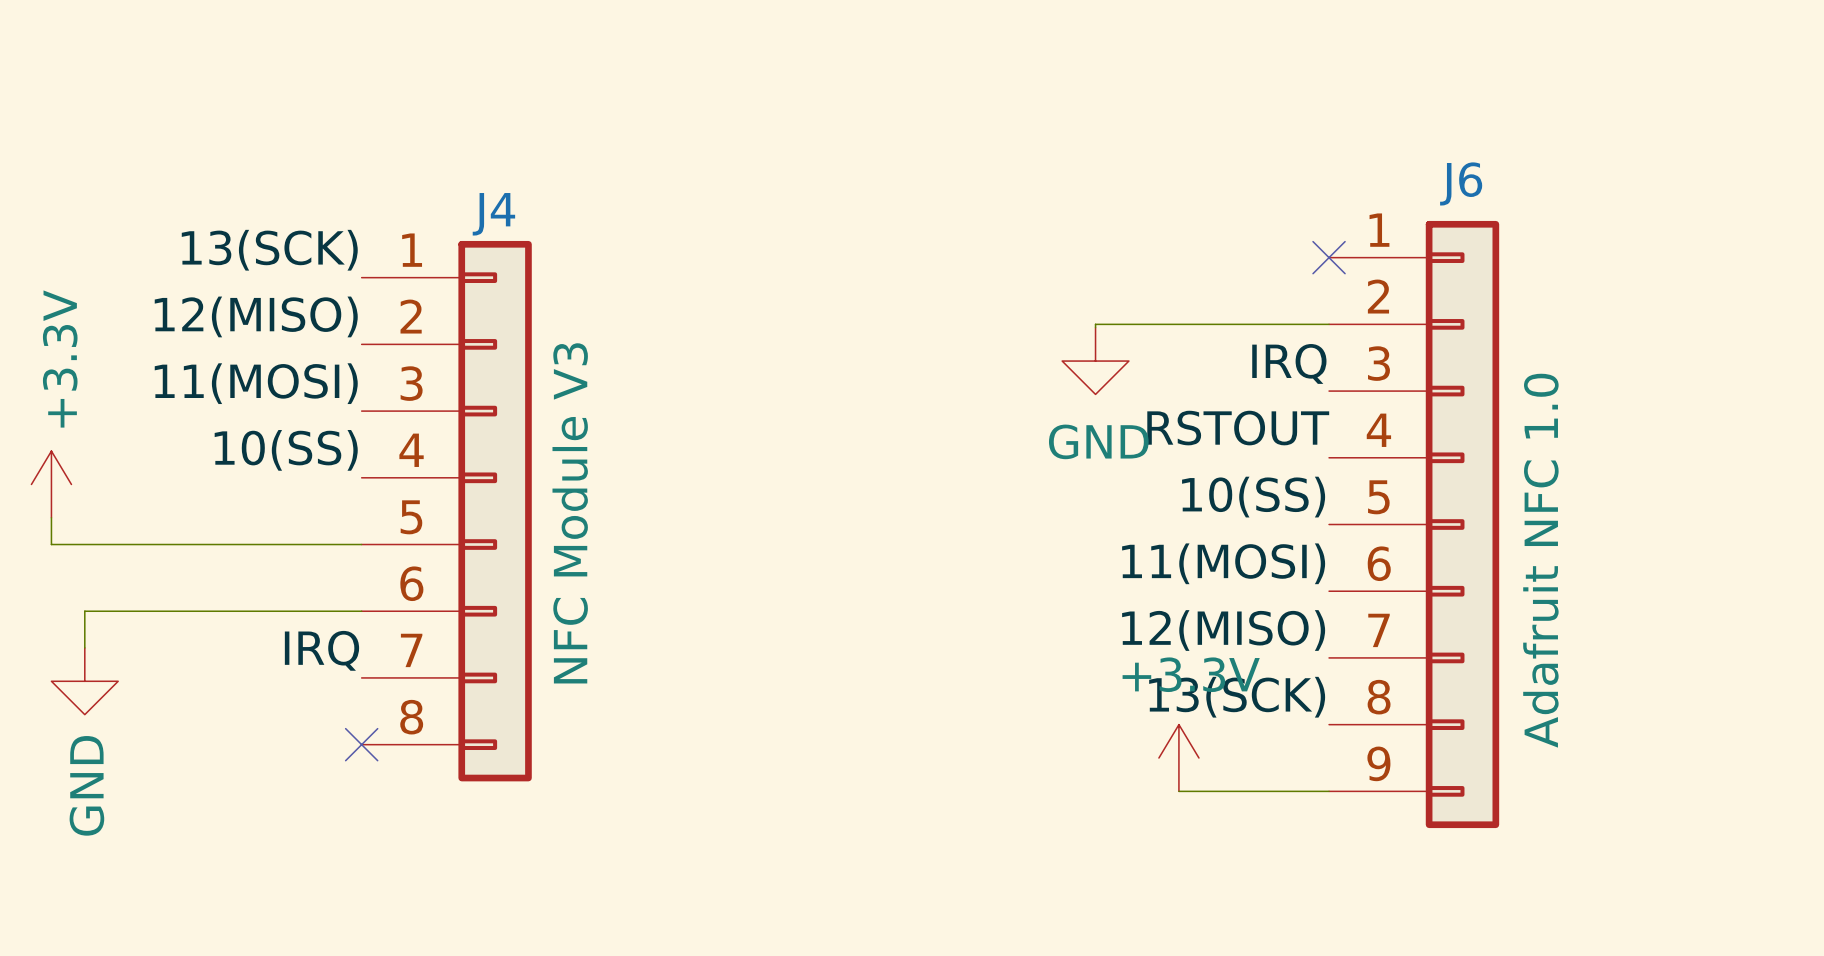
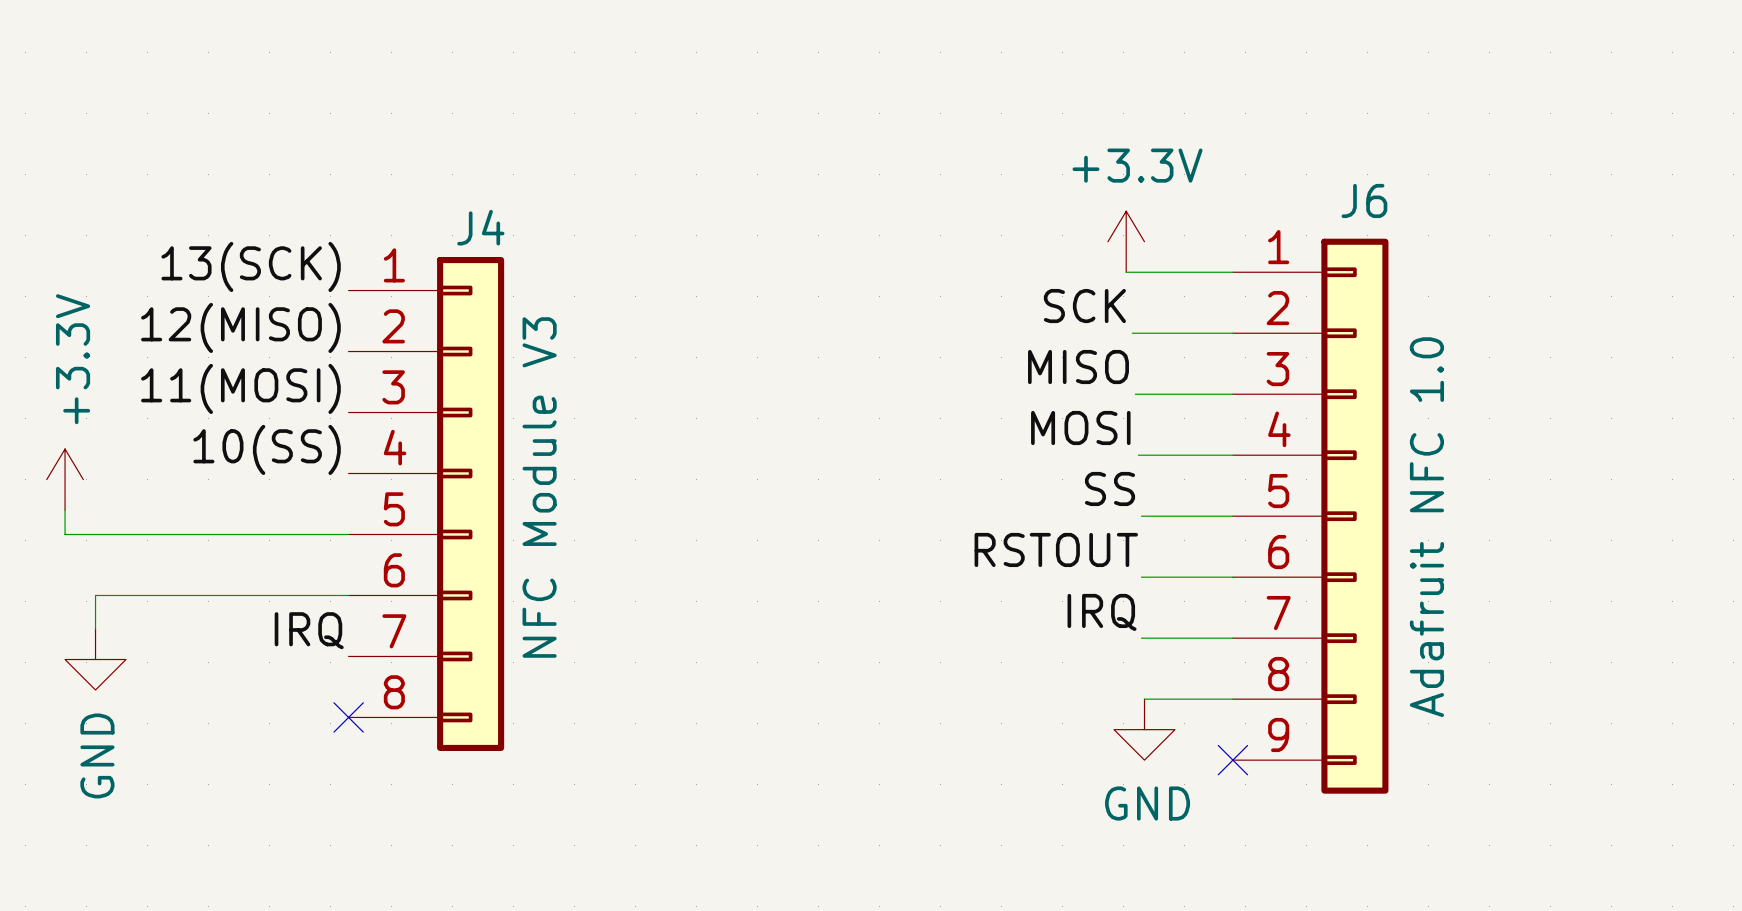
wire: none -> (1126, 272) (1232, 272)
no-connect mark: (1329, 257) -> none
label: none -> SCK (1084, 306)
wire: (1218, 324) (1095, 324) (1095, 327) -> none
power symbol position: GND (1095, 361) -> GND (1144, 729)
label: none -> MISO (1078, 367)
label position: IRQ (1289, 363) -> IRQ (1102, 612)
wire: none -> (1135, 394) (1232, 394)
label: none -> MOSI (1080, 427)
label position: RSTOUT (1238, 428) -> RSTOUT (1056, 549)
wire: none -> (1138, 455) (1232, 455)
label: none -> SS (1110, 488)
label: 10(SS) (1253, 497) -> none
wire: none -> (1141, 516) (1232, 516)
label: 11(MOSI) (1223, 563) -> none
wire: none -> (1141, 577) (1232, 577)
label: 12(MISO) (1223, 630) -> none
wire: none -> (1141, 638) (1232, 638)
label: 13(SCK) (1237, 697) -> none
wire: none -> (1144, 699) (1232, 699)
power symbol position: +3.3V (1178, 758) -> +3.3V (1126, 241)
wire: (1178, 791) (1329, 791) -> none
no-connect mark: none -> (1232, 760)

